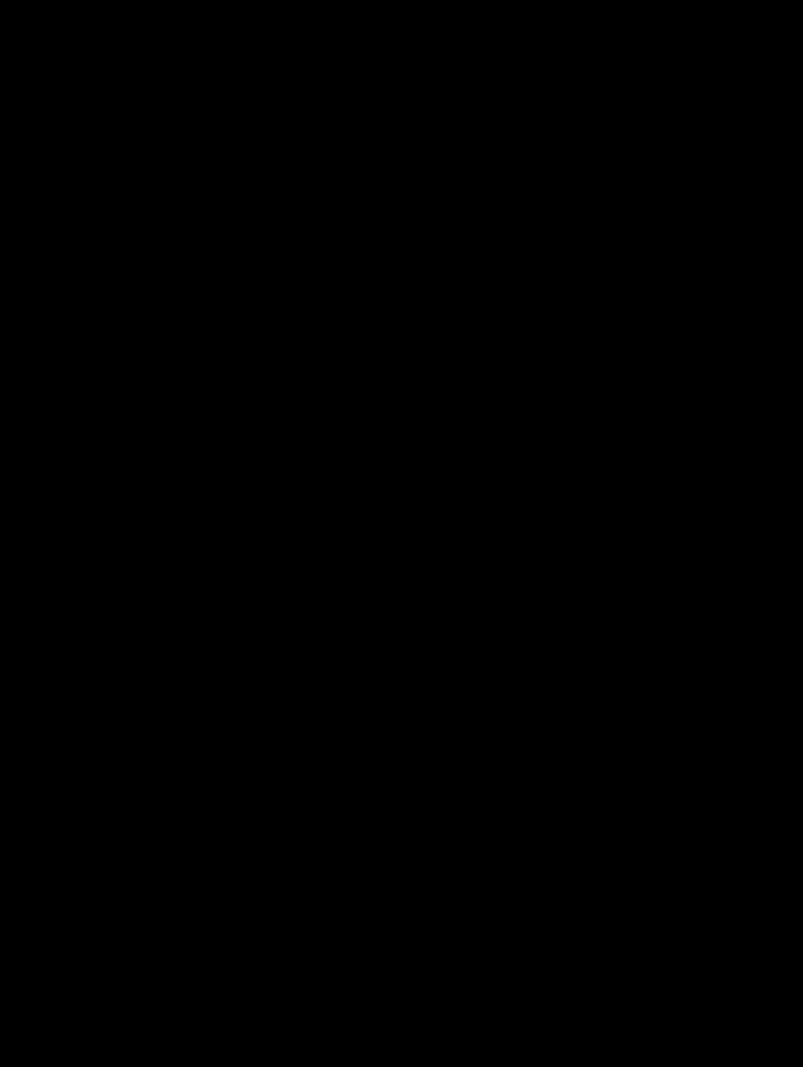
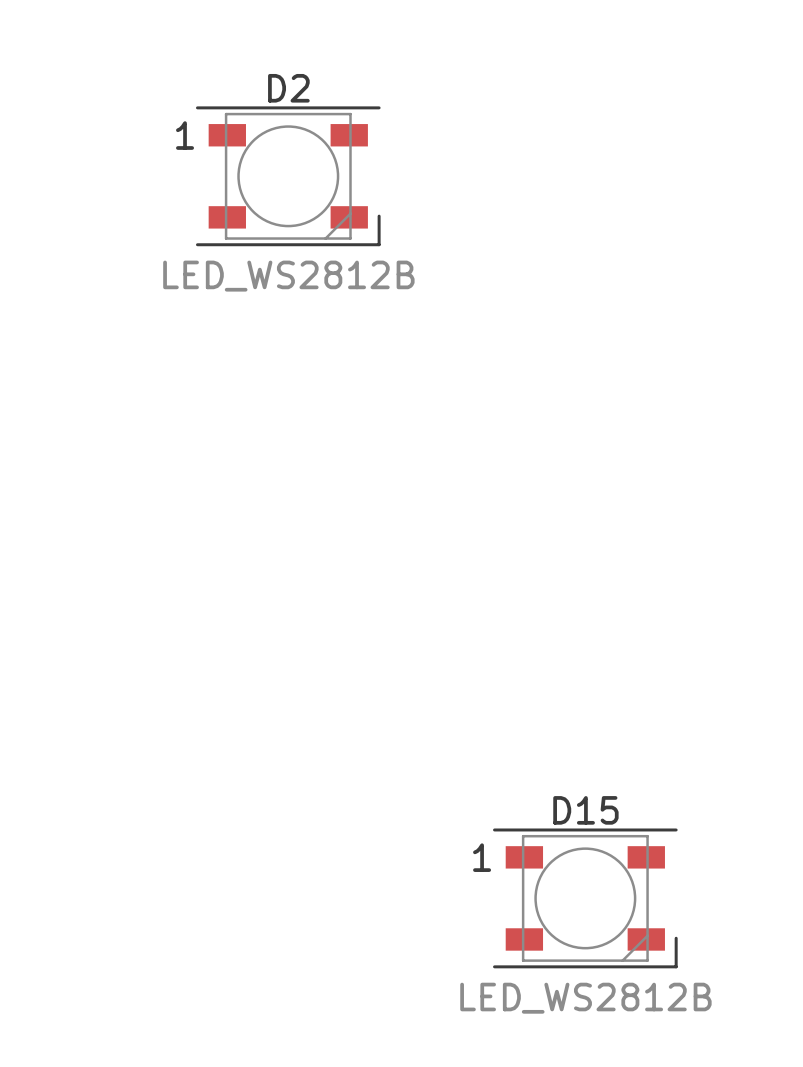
D2: none -> LED_WS2812B (288, 176)
D15: none -> LED_WS2812B (585, 898)

